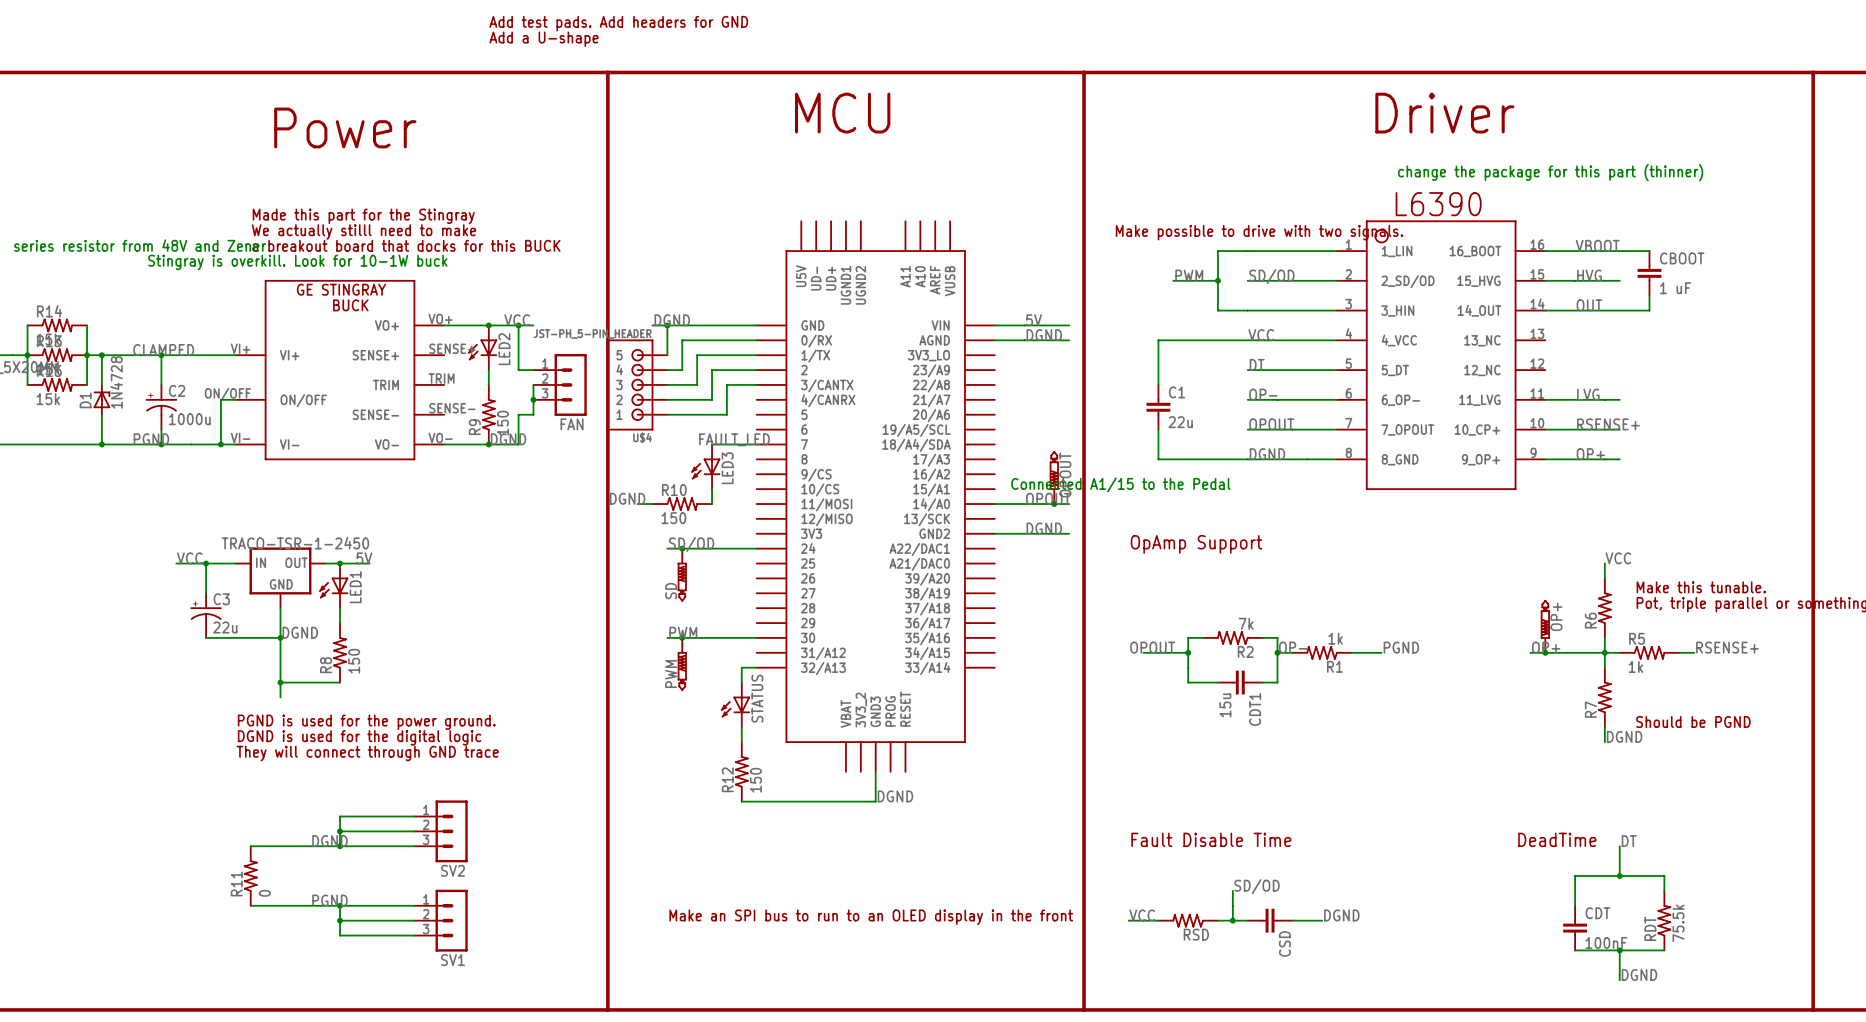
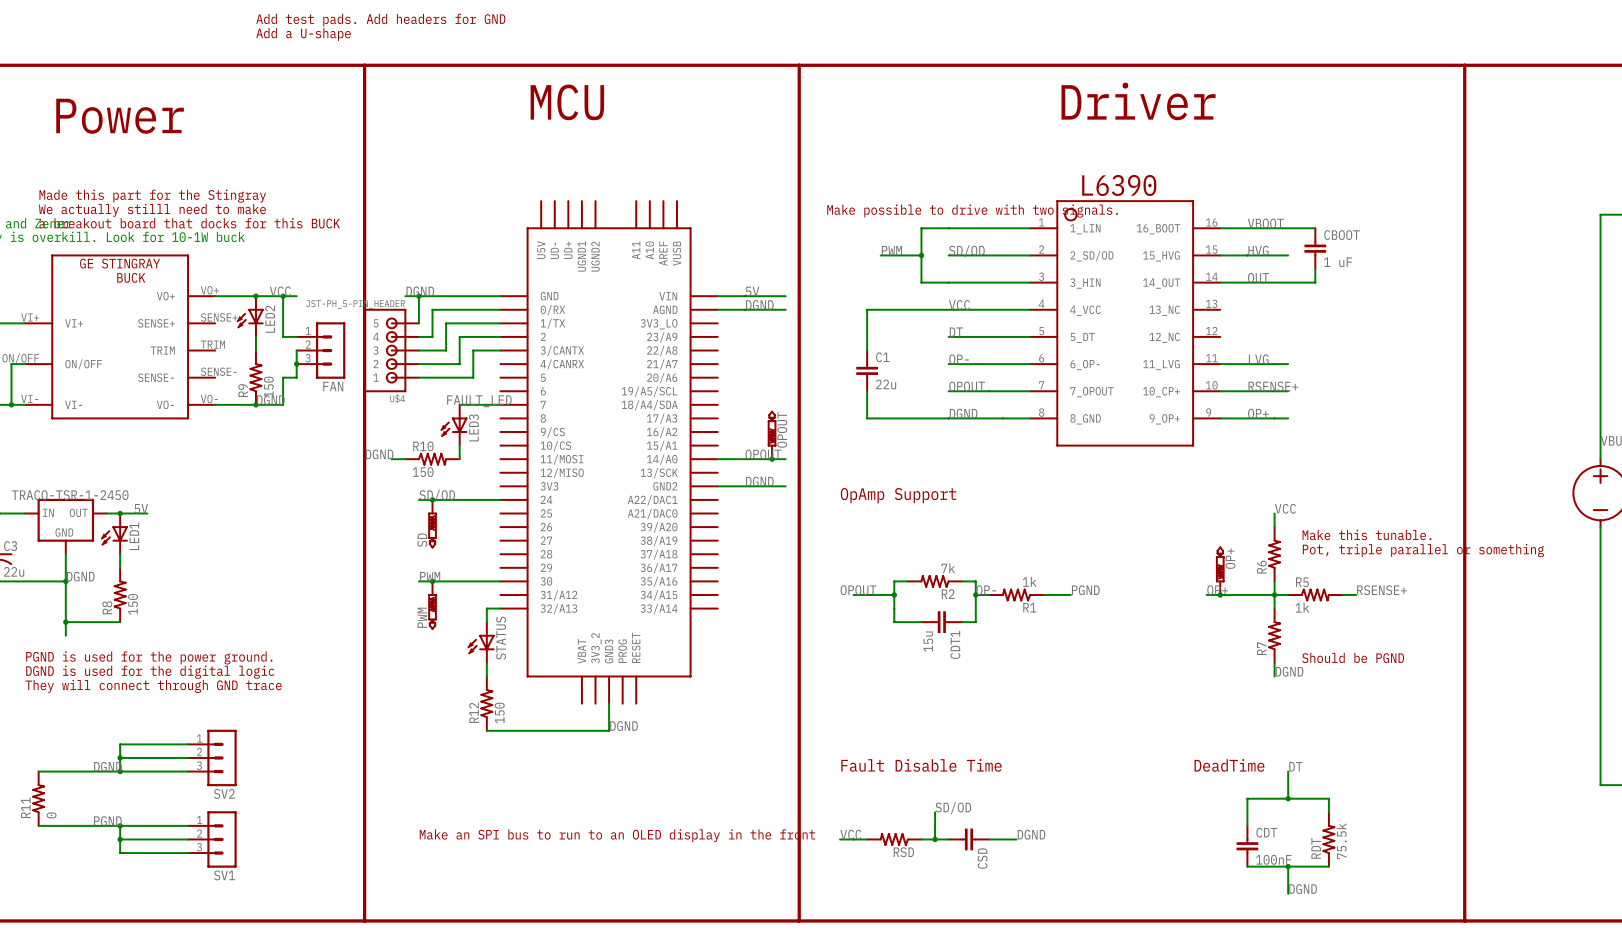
text: change the package for this part (thinner) (1550, 172) -> none
text: Connected A1/15 to the Pedal (1120, 484) -> none

